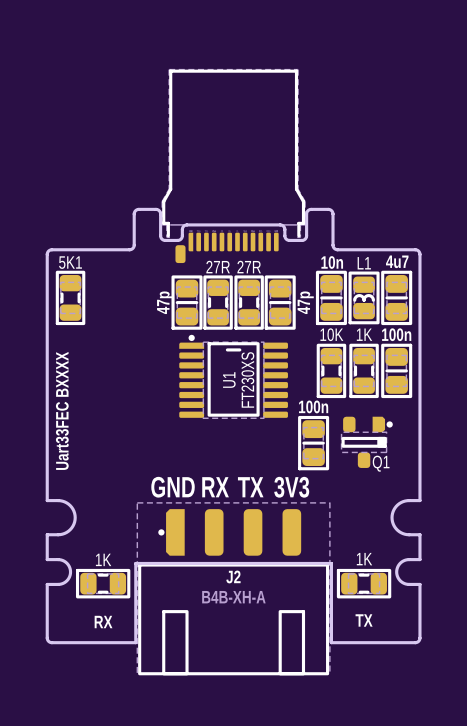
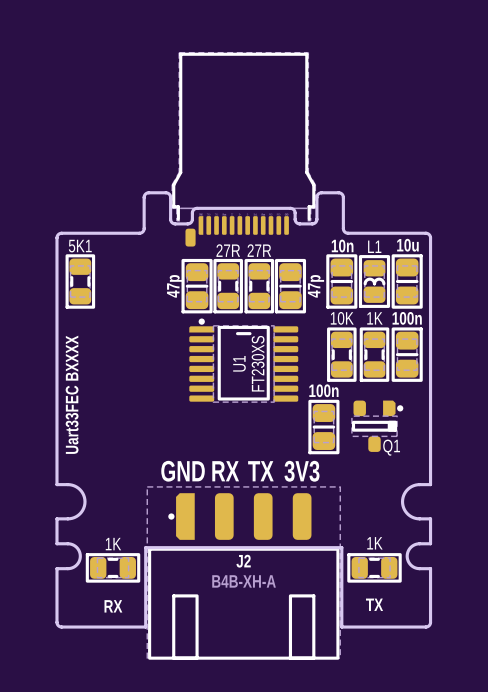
part value: 4u7 (397, 261) -> 10u (407, 245)

